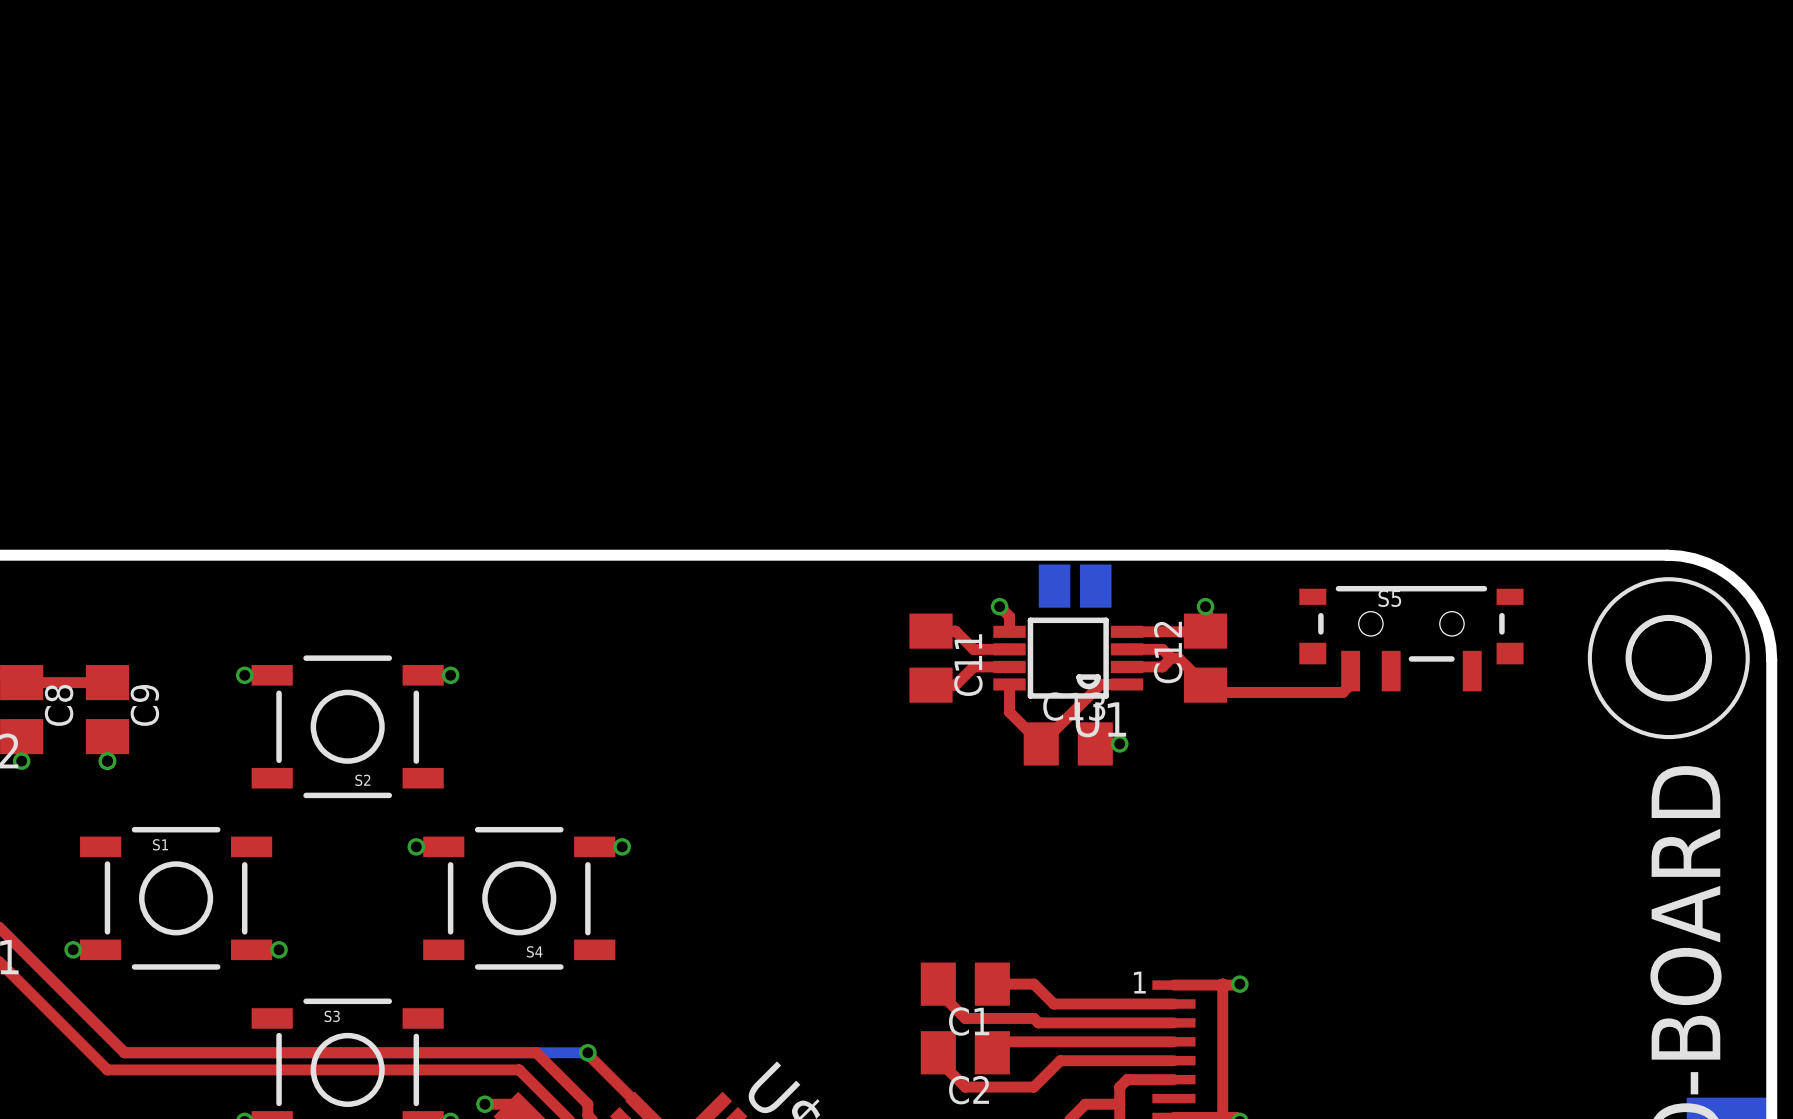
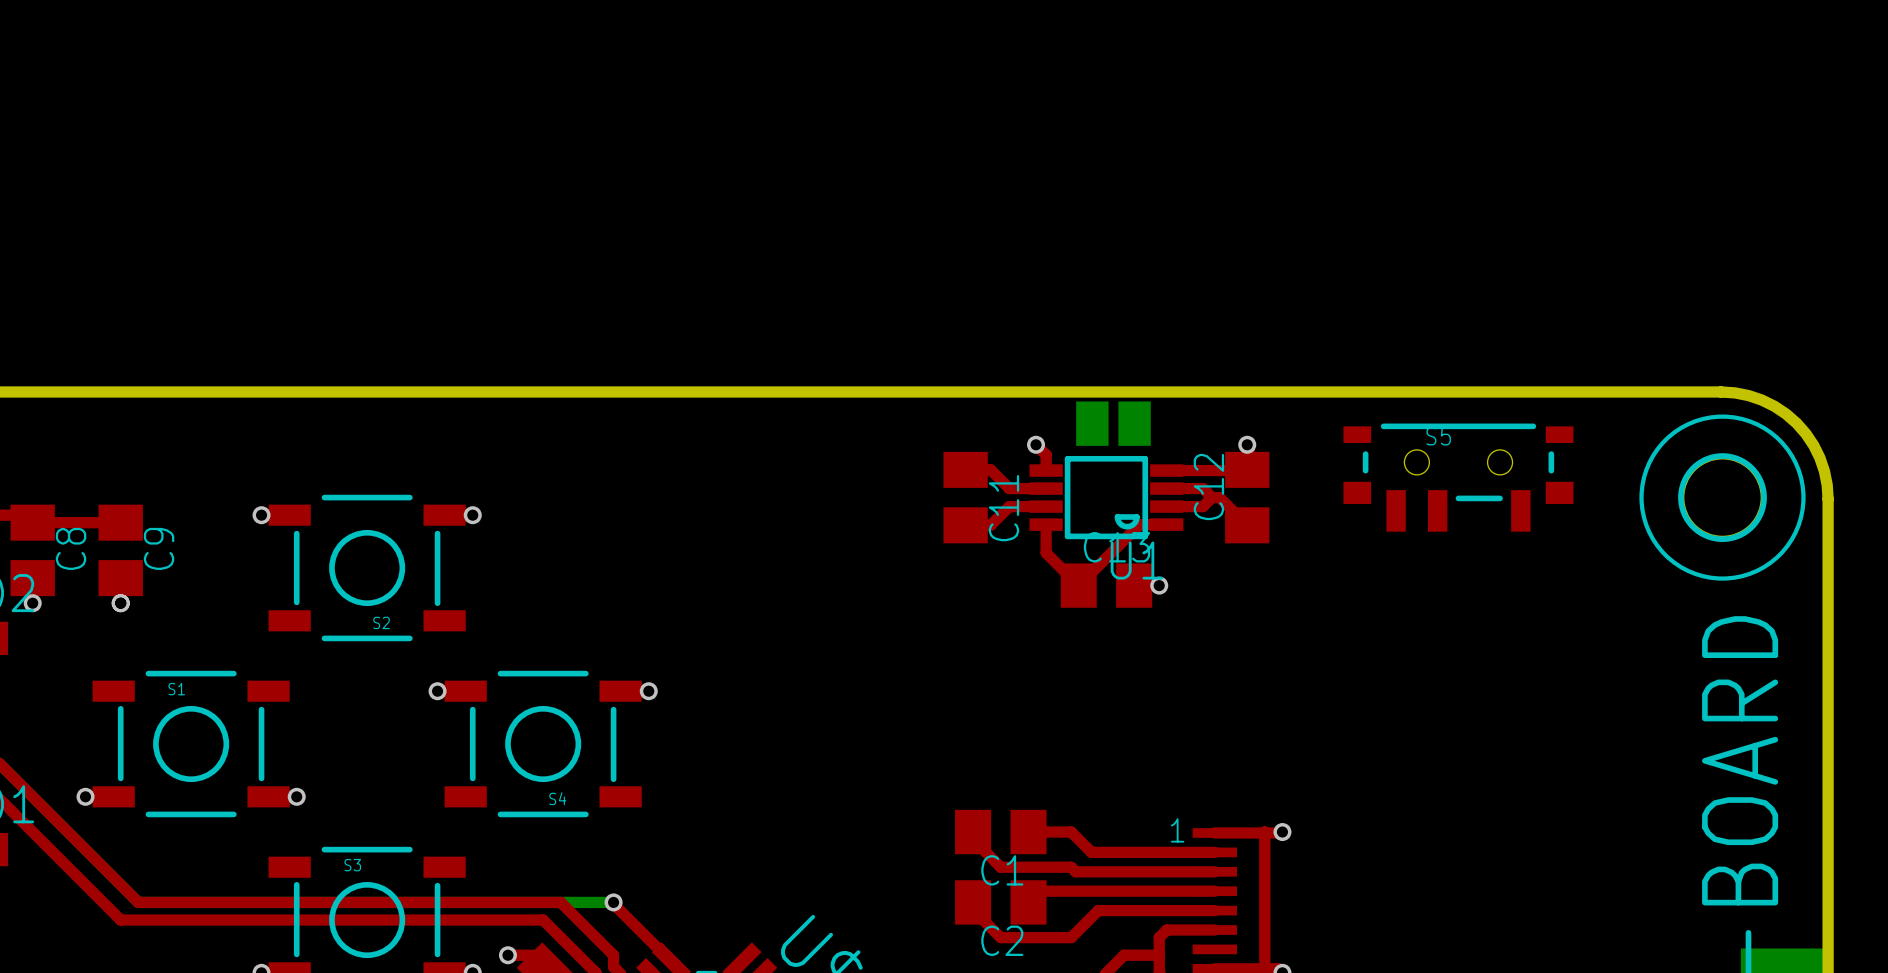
top track: (1350, 671) (1350, 684) (1342, 692) (1212, 692) (1205, 685) -> none

